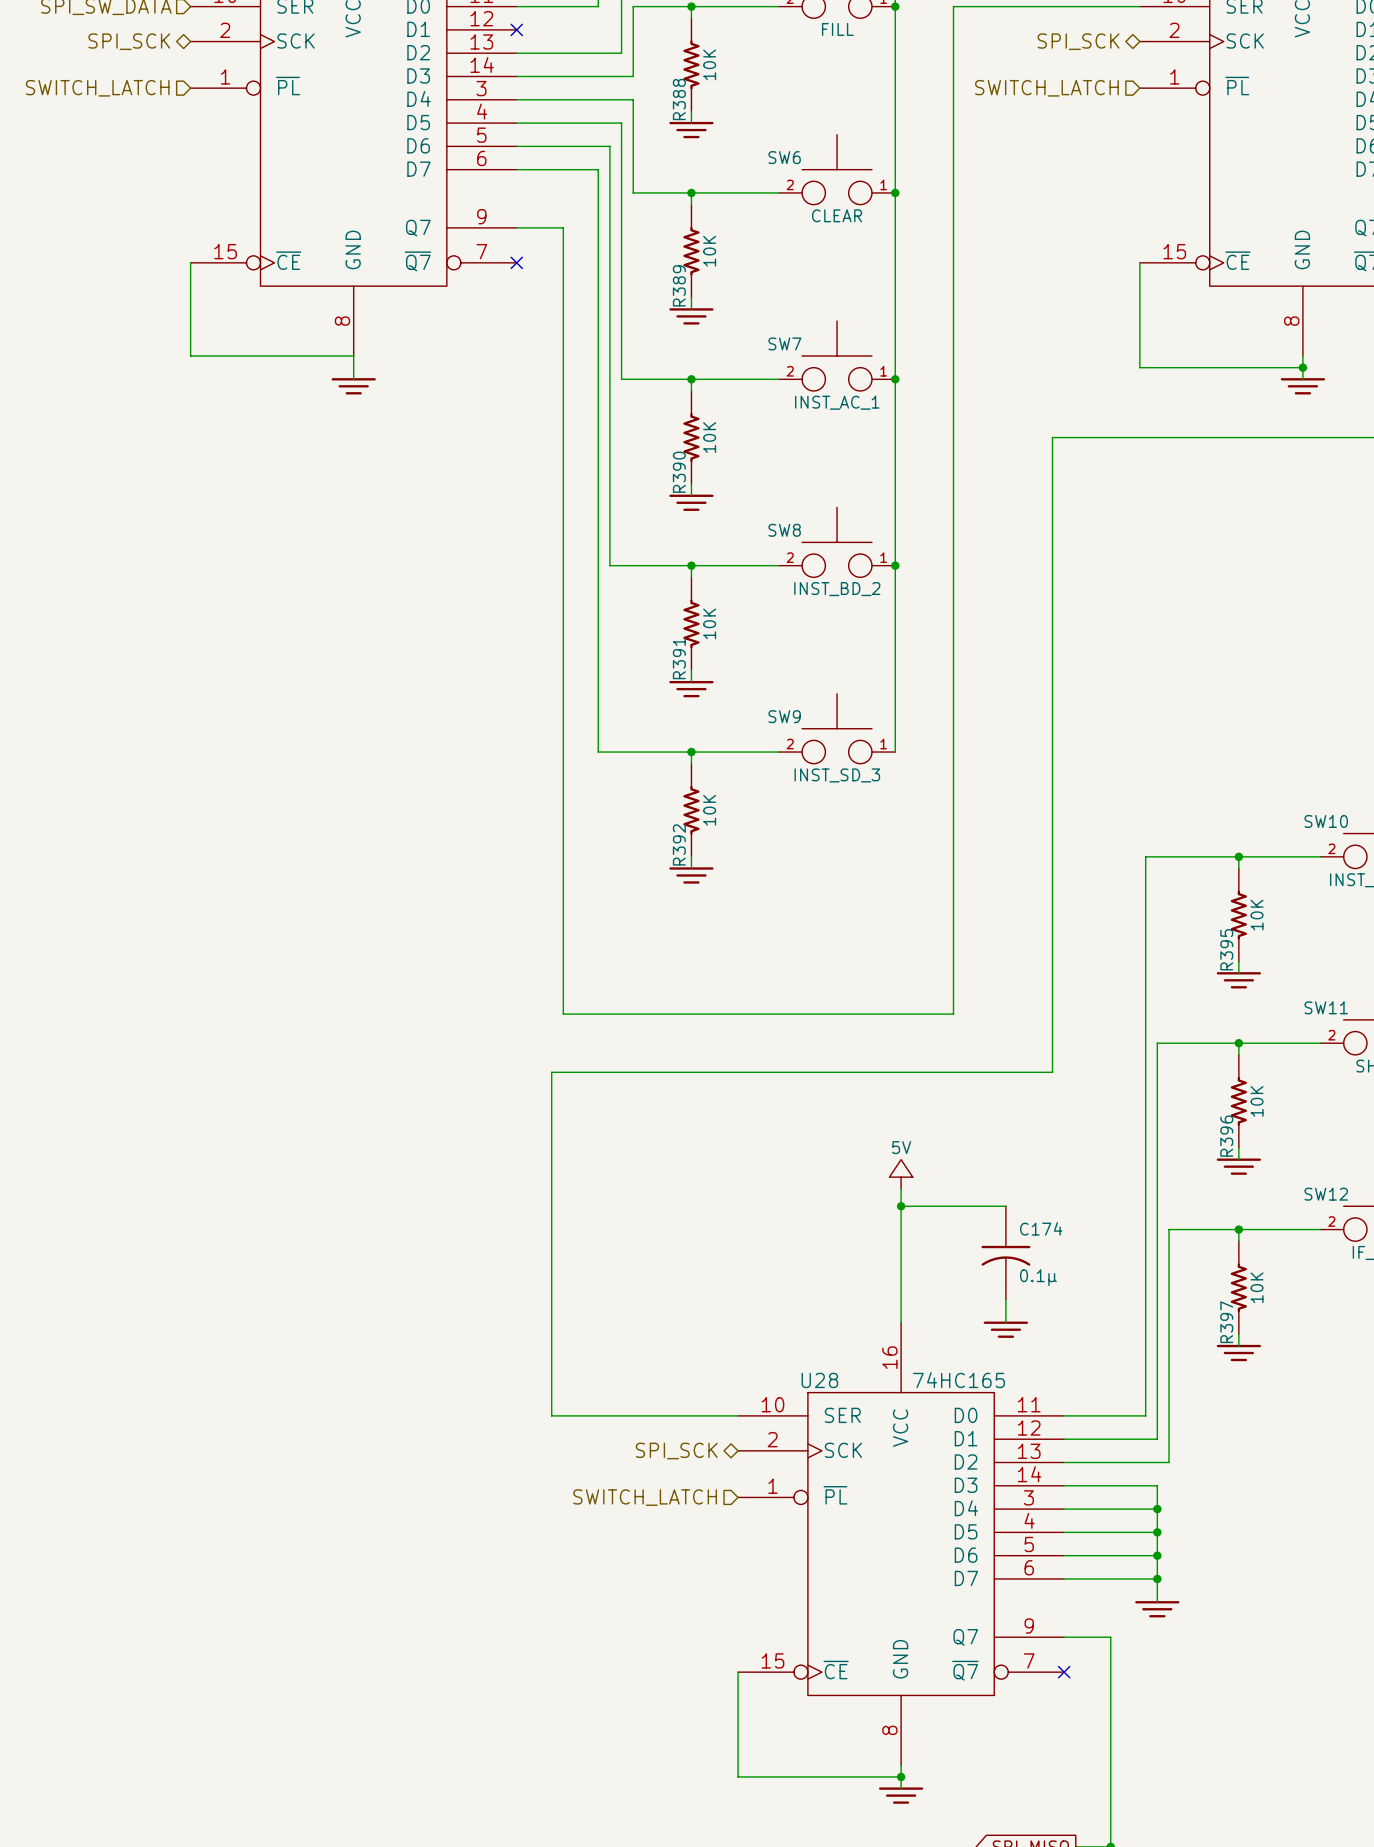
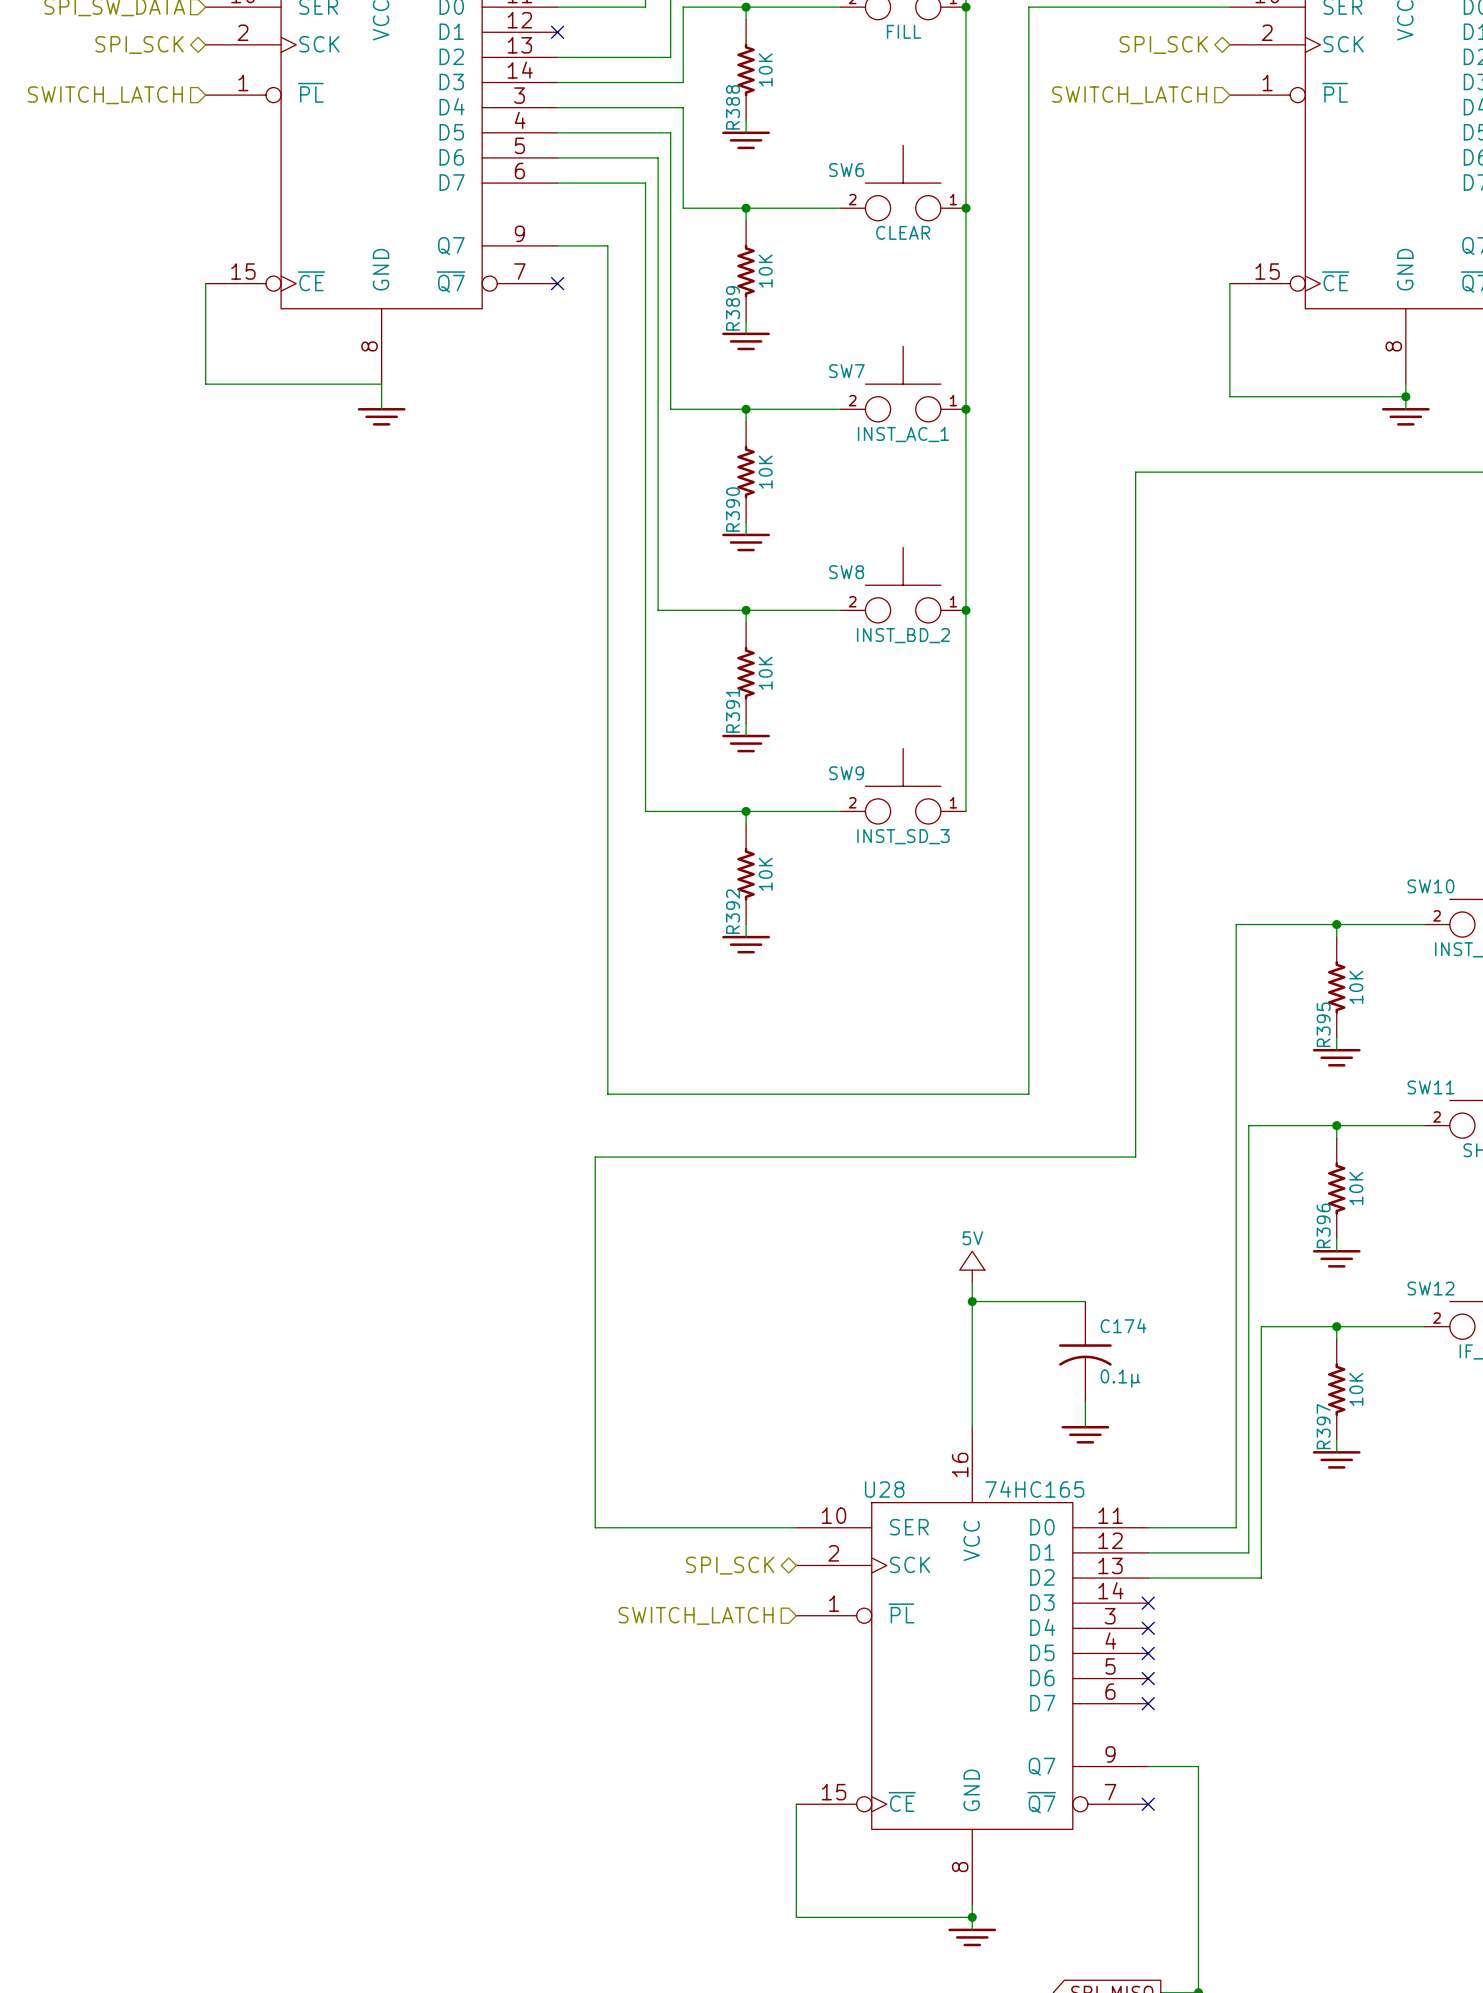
wire: (1064, 1485) (1157, 1485) (1157, 1602) -> none
no-connect mark: none -> (1148, 1603)
wire: (1064, 1509) (1157, 1509) -> none
no-connect mark: none -> (1148, 1628)
junction: (1157, 1509) -> none
wire: (1064, 1532) (1157, 1532) -> none
no-connect mark: none -> (1148, 1653)
junction: (1157, 1532) -> none
wire: (1064, 1555) (1157, 1555) -> none
no-connect mark: none -> (1148, 1678)
junction: (1157, 1555) -> none
wire: (1064, 1578) (1157, 1578) -> none
no-connect mark: none -> (1148, 1703)
junction: (1157, 1578) -> none
power symbol: (1157, 1609) -> none

